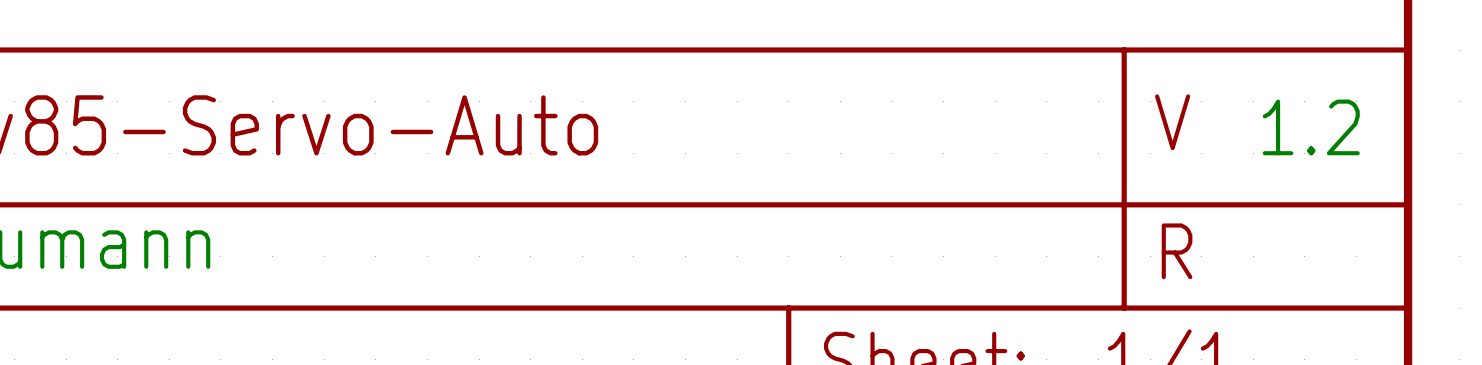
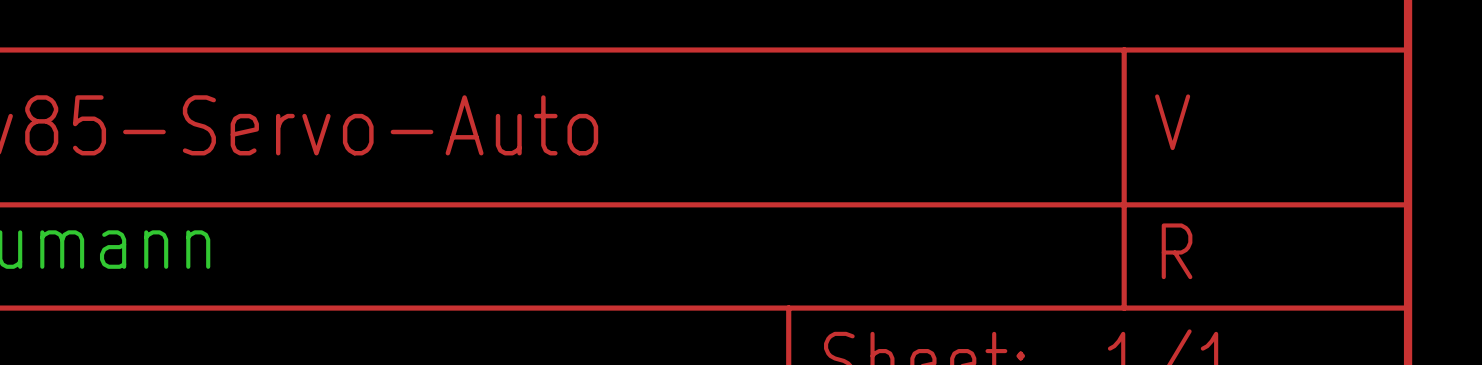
text: 1.2 (1311, 127) -> none

